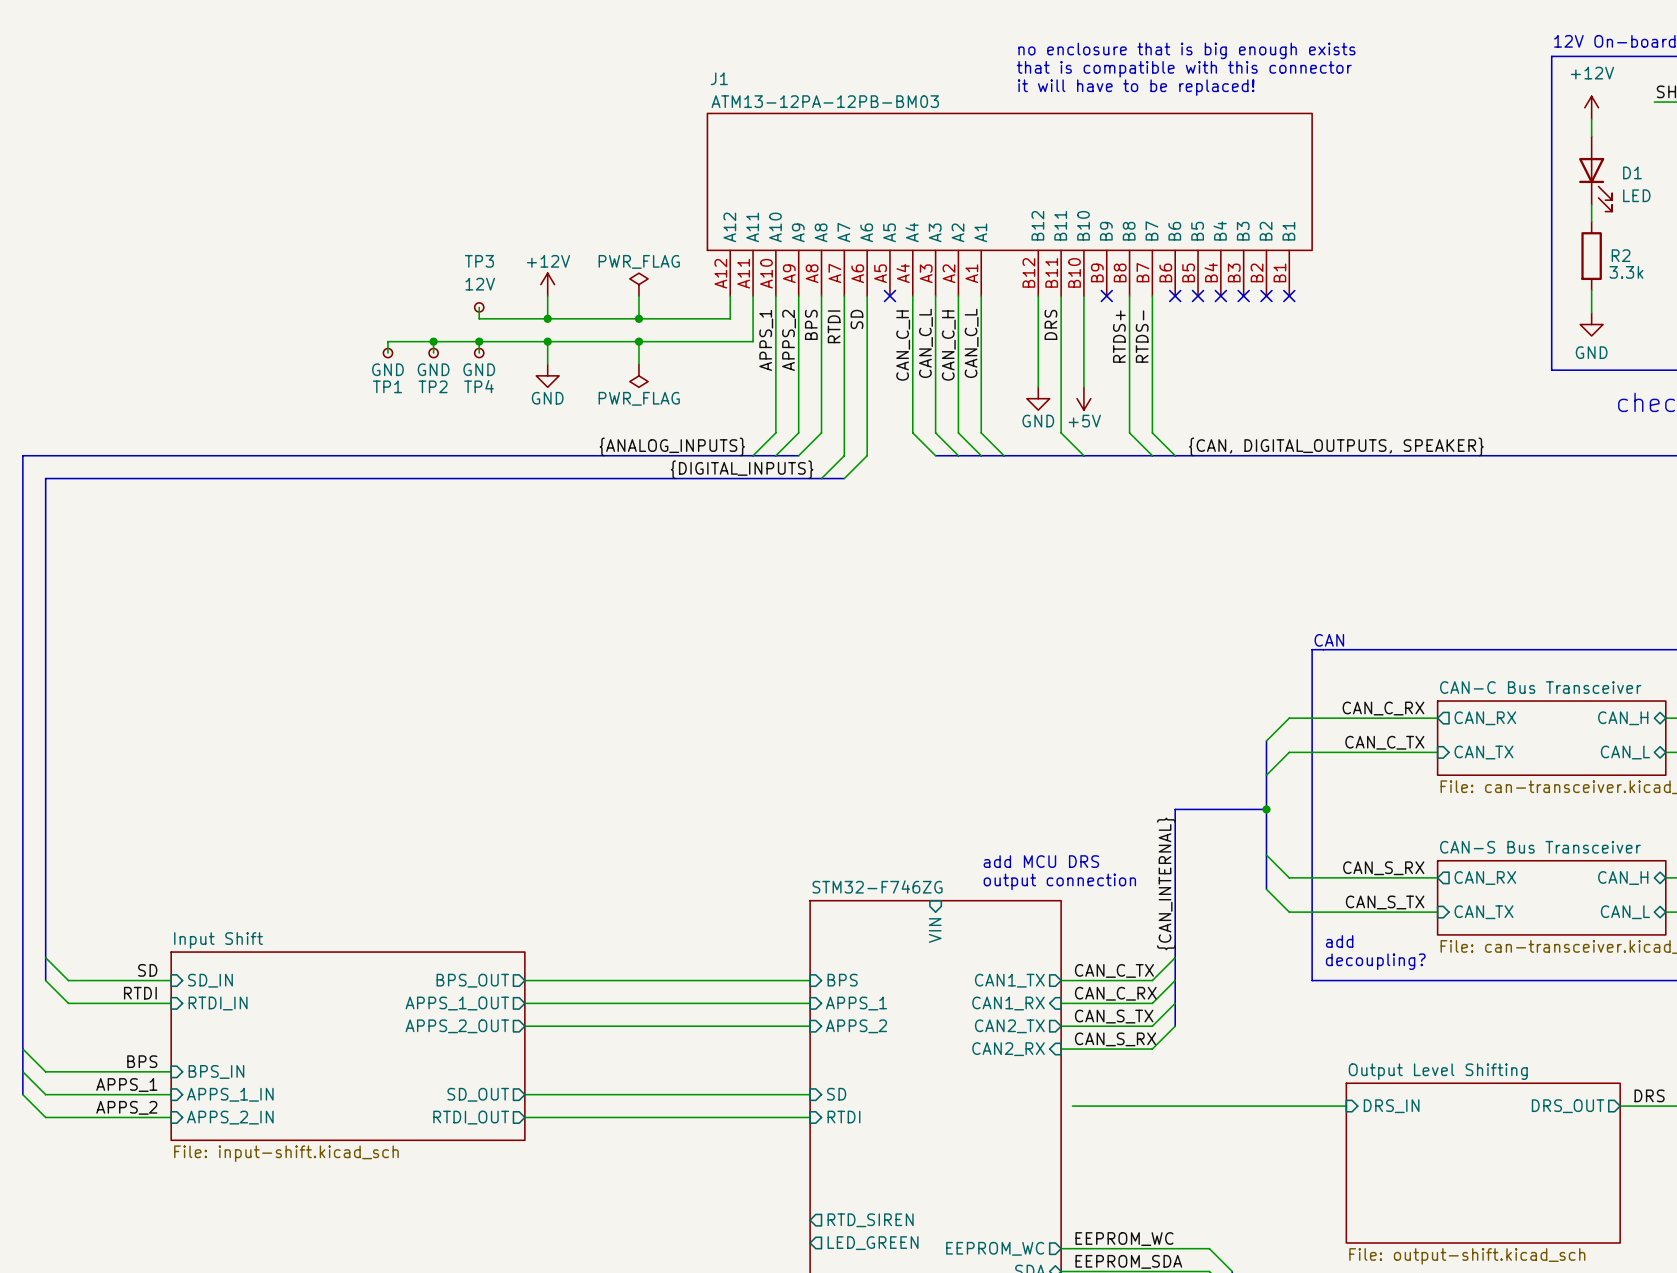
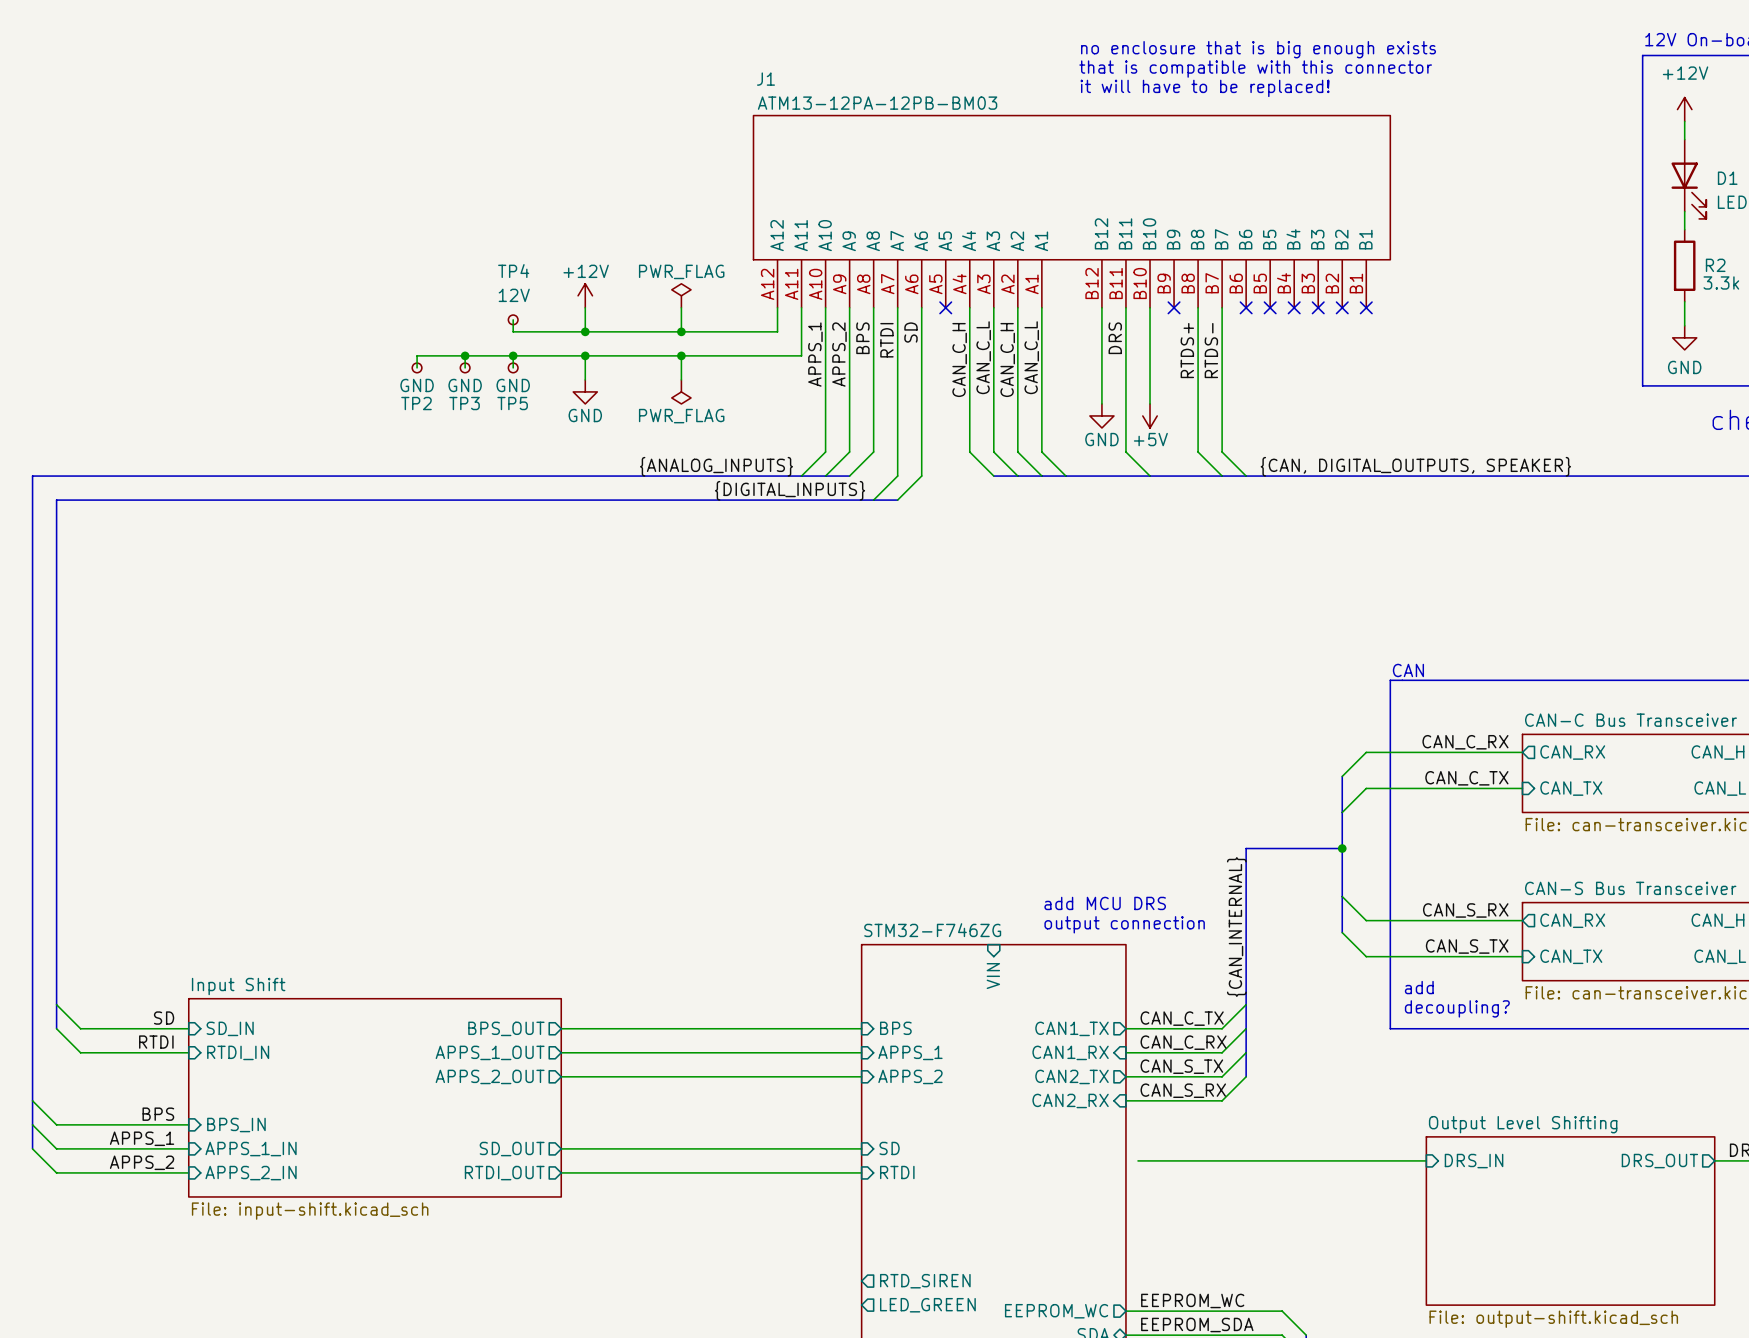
TP3 name: TP3 (479, 261) -> TP4 (513, 271)
TP1 name: TP1 (387, 386) -> TP2 (416, 403)
TP2 name: TP2 (433, 386) -> TP3 (464, 403)
TP4 name: TP4 (478, 386) -> TP5 (512, 403)

